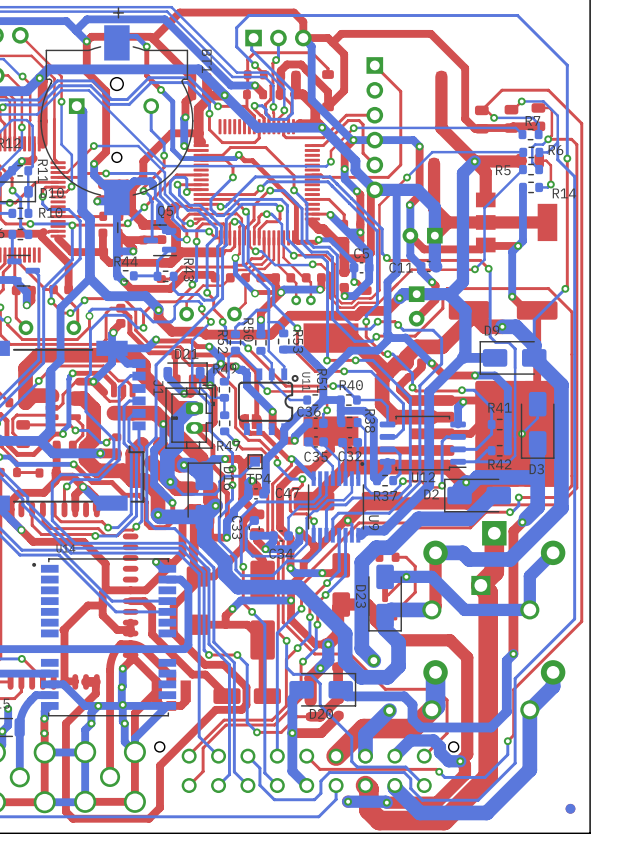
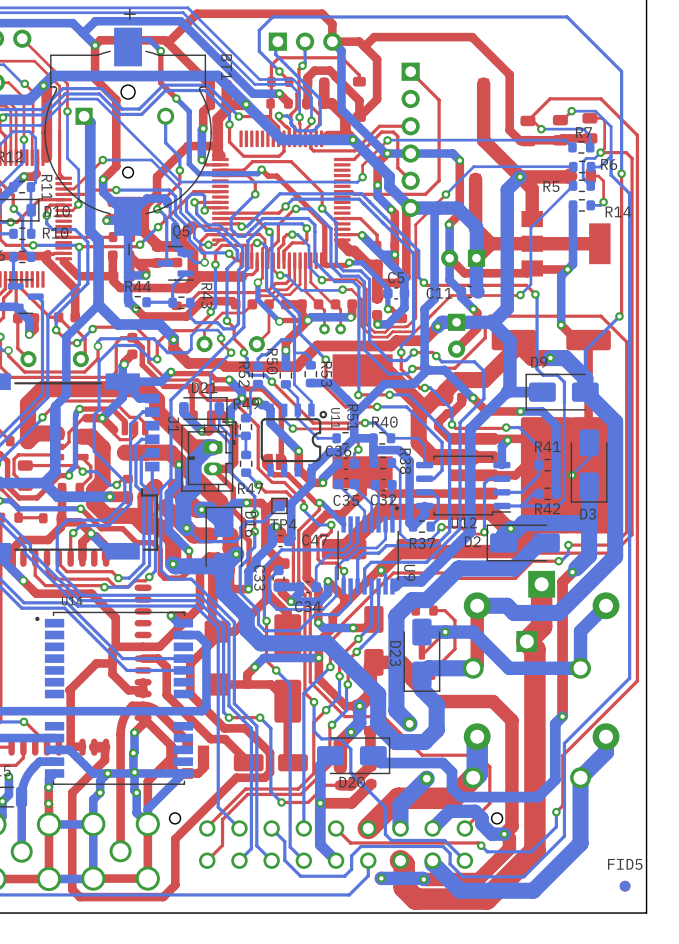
FID5 name: none -> FID5 (625, 864)

